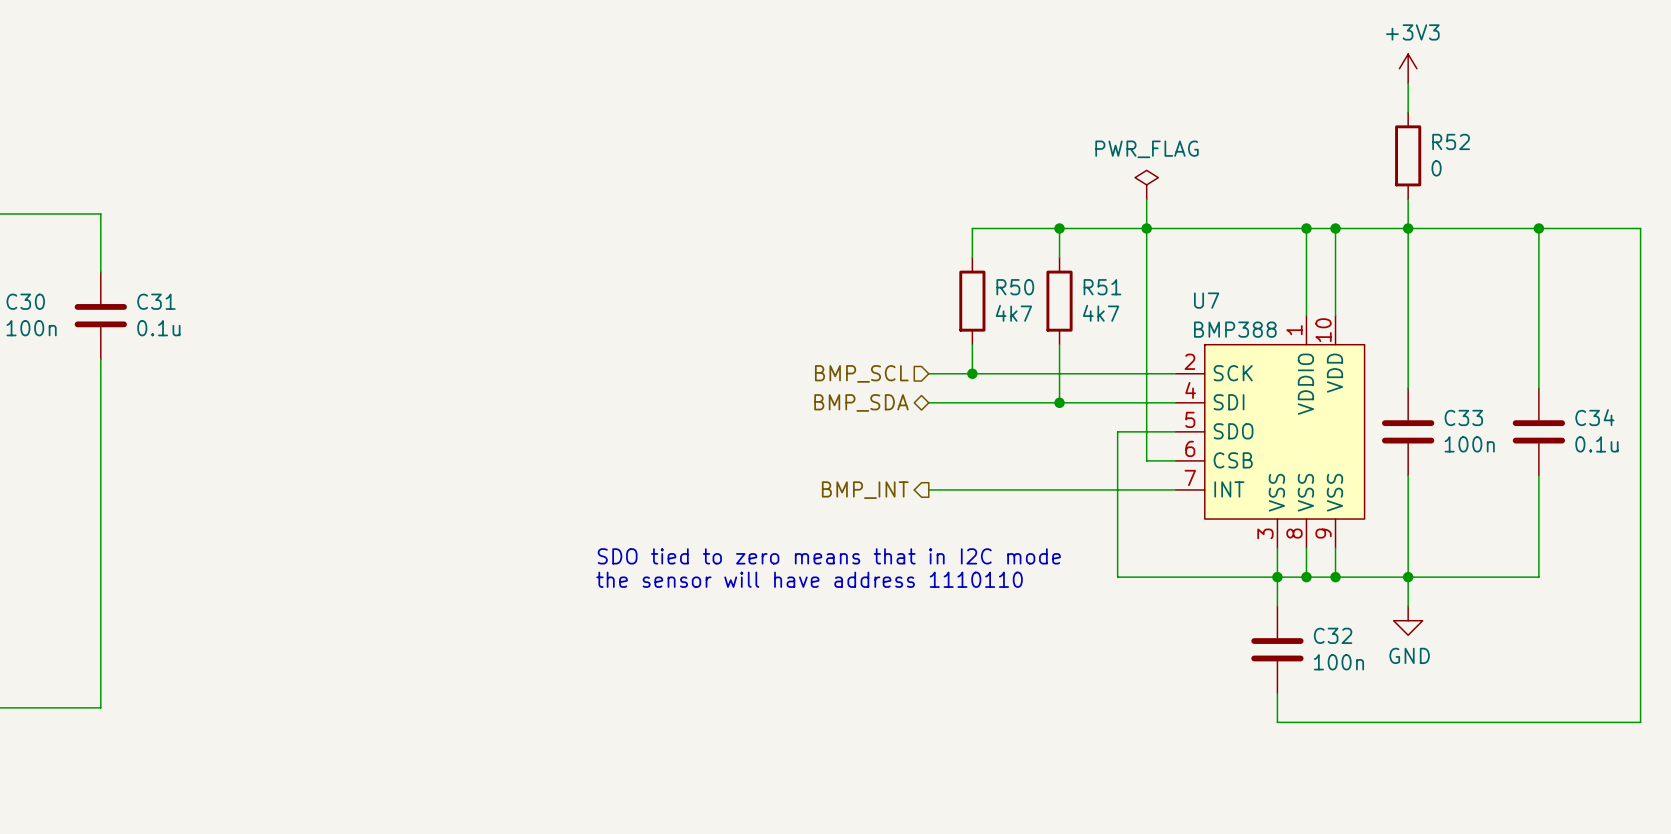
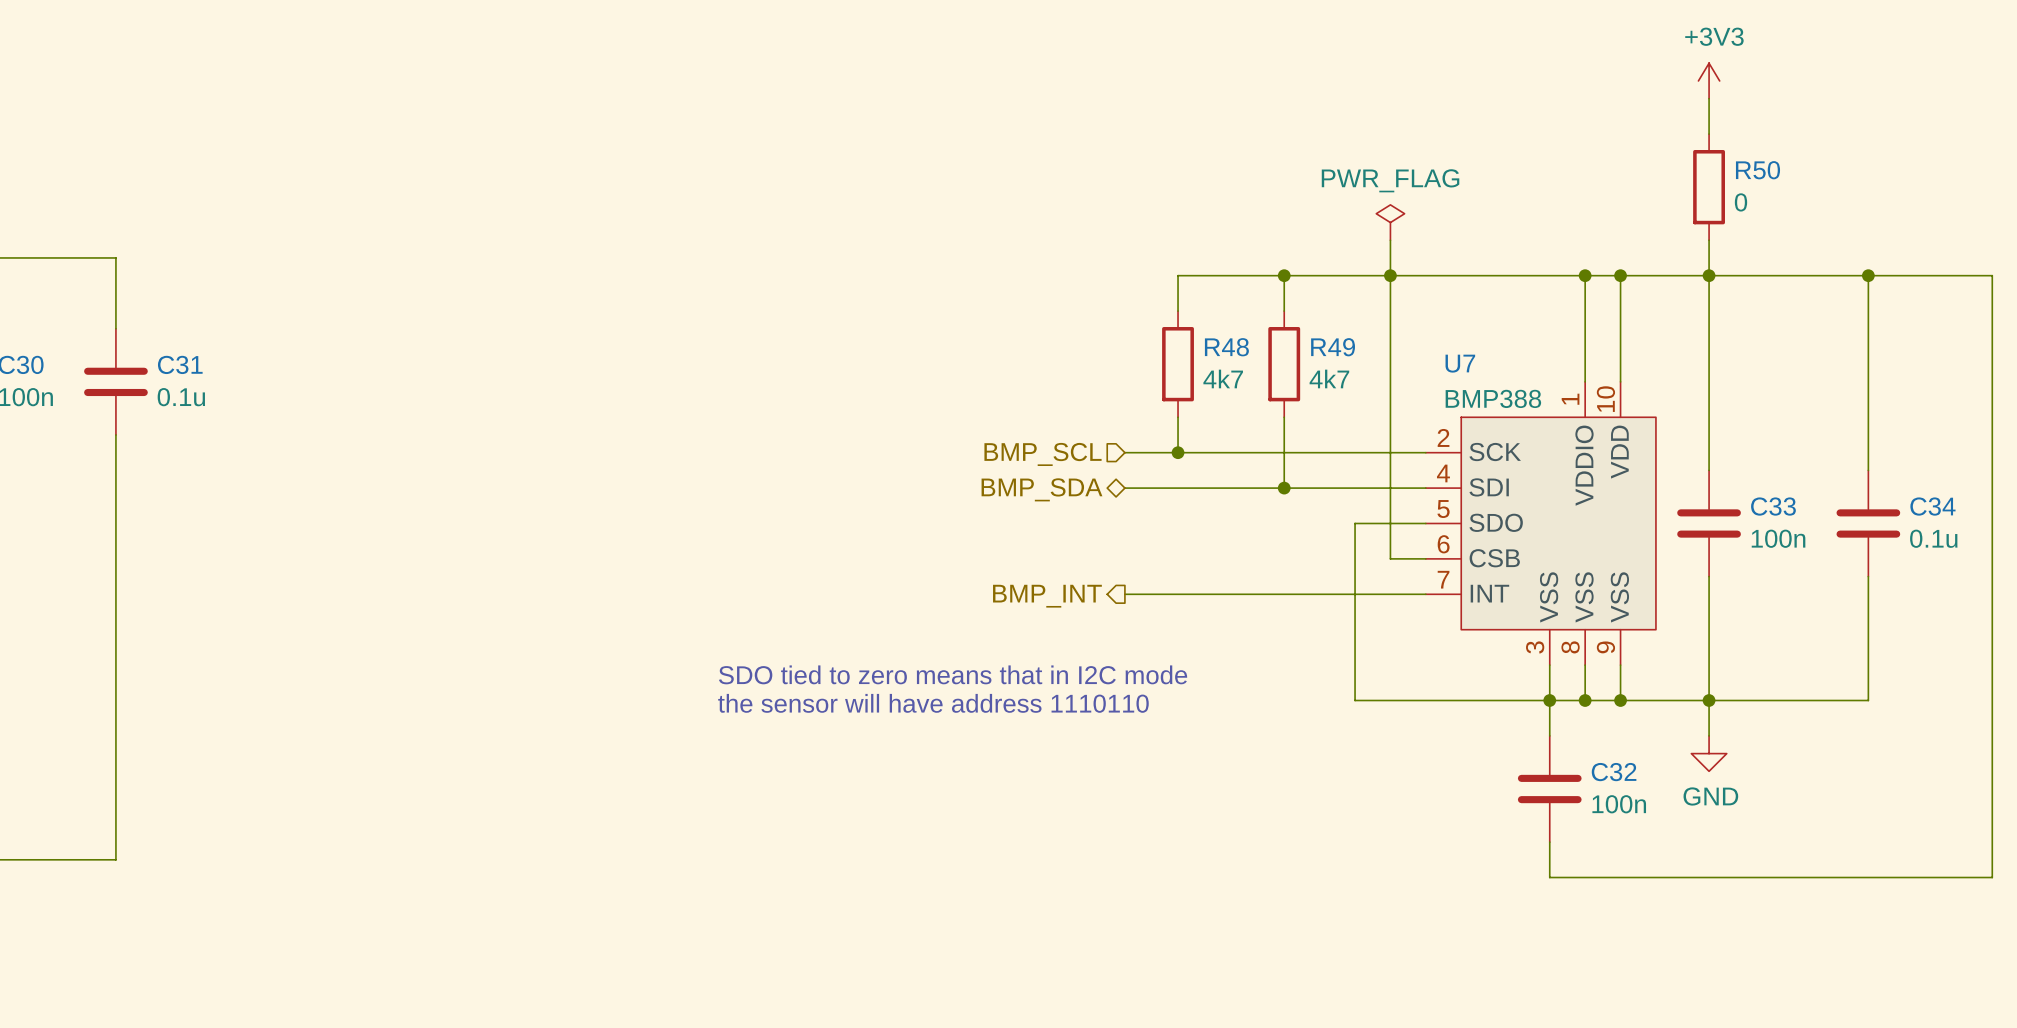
R52 name: R52 (1451, 141) -> R50 (1757, 170)
R50 name: R50 (1015, 287) -> R48 (1226, 347)
R51 name: R51 (1102, 287) -> R49 (1333, 347)

